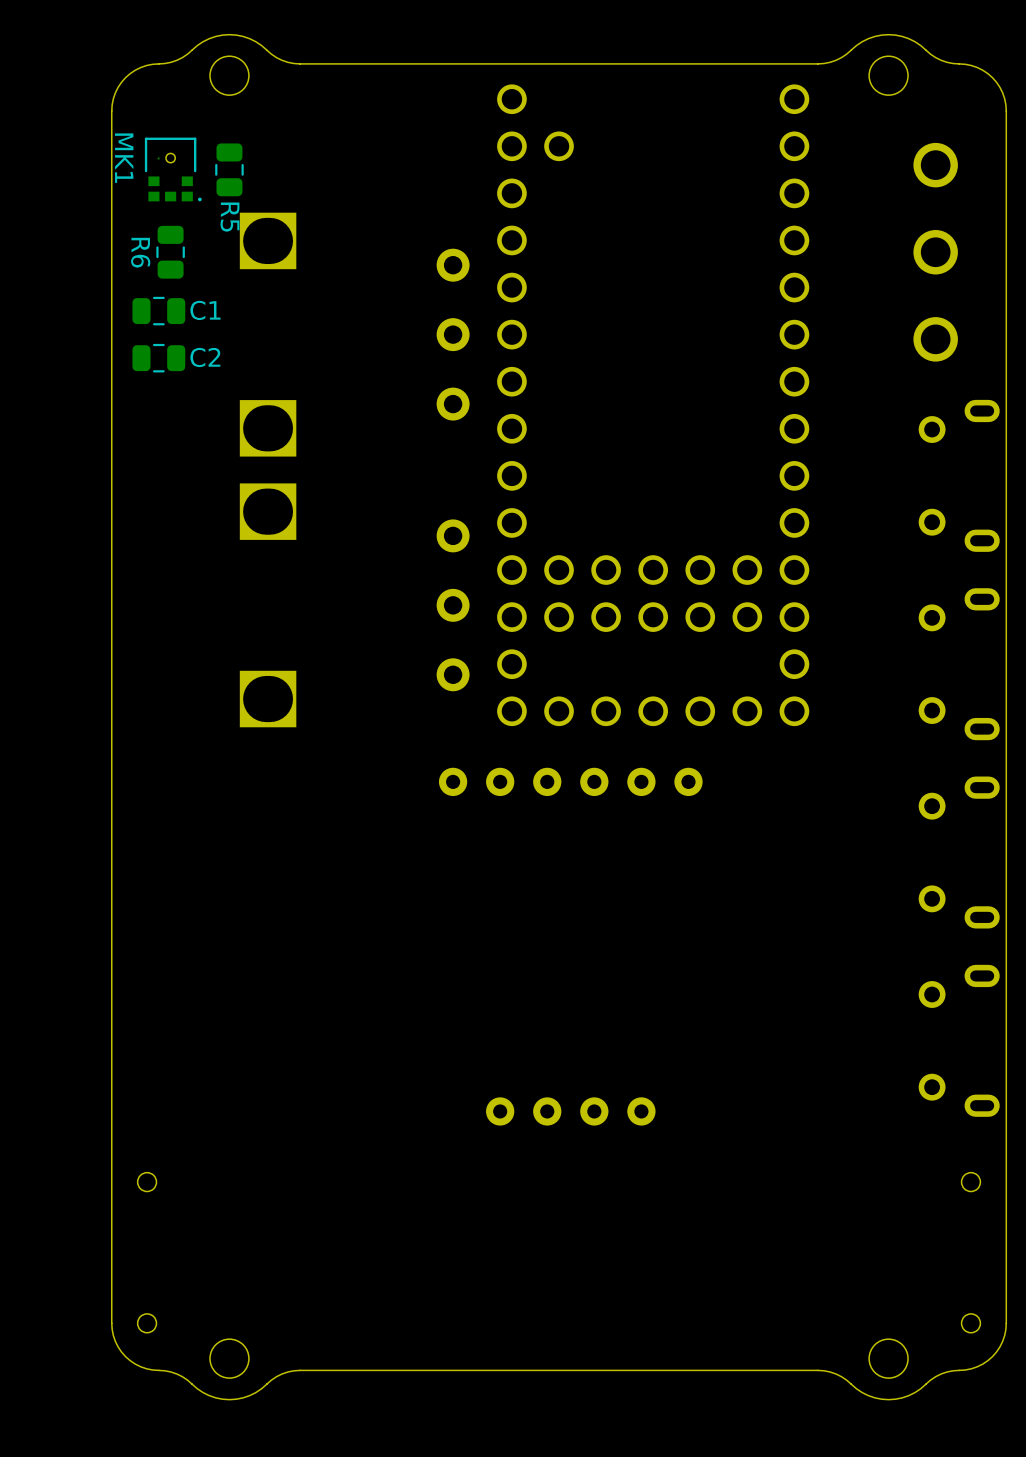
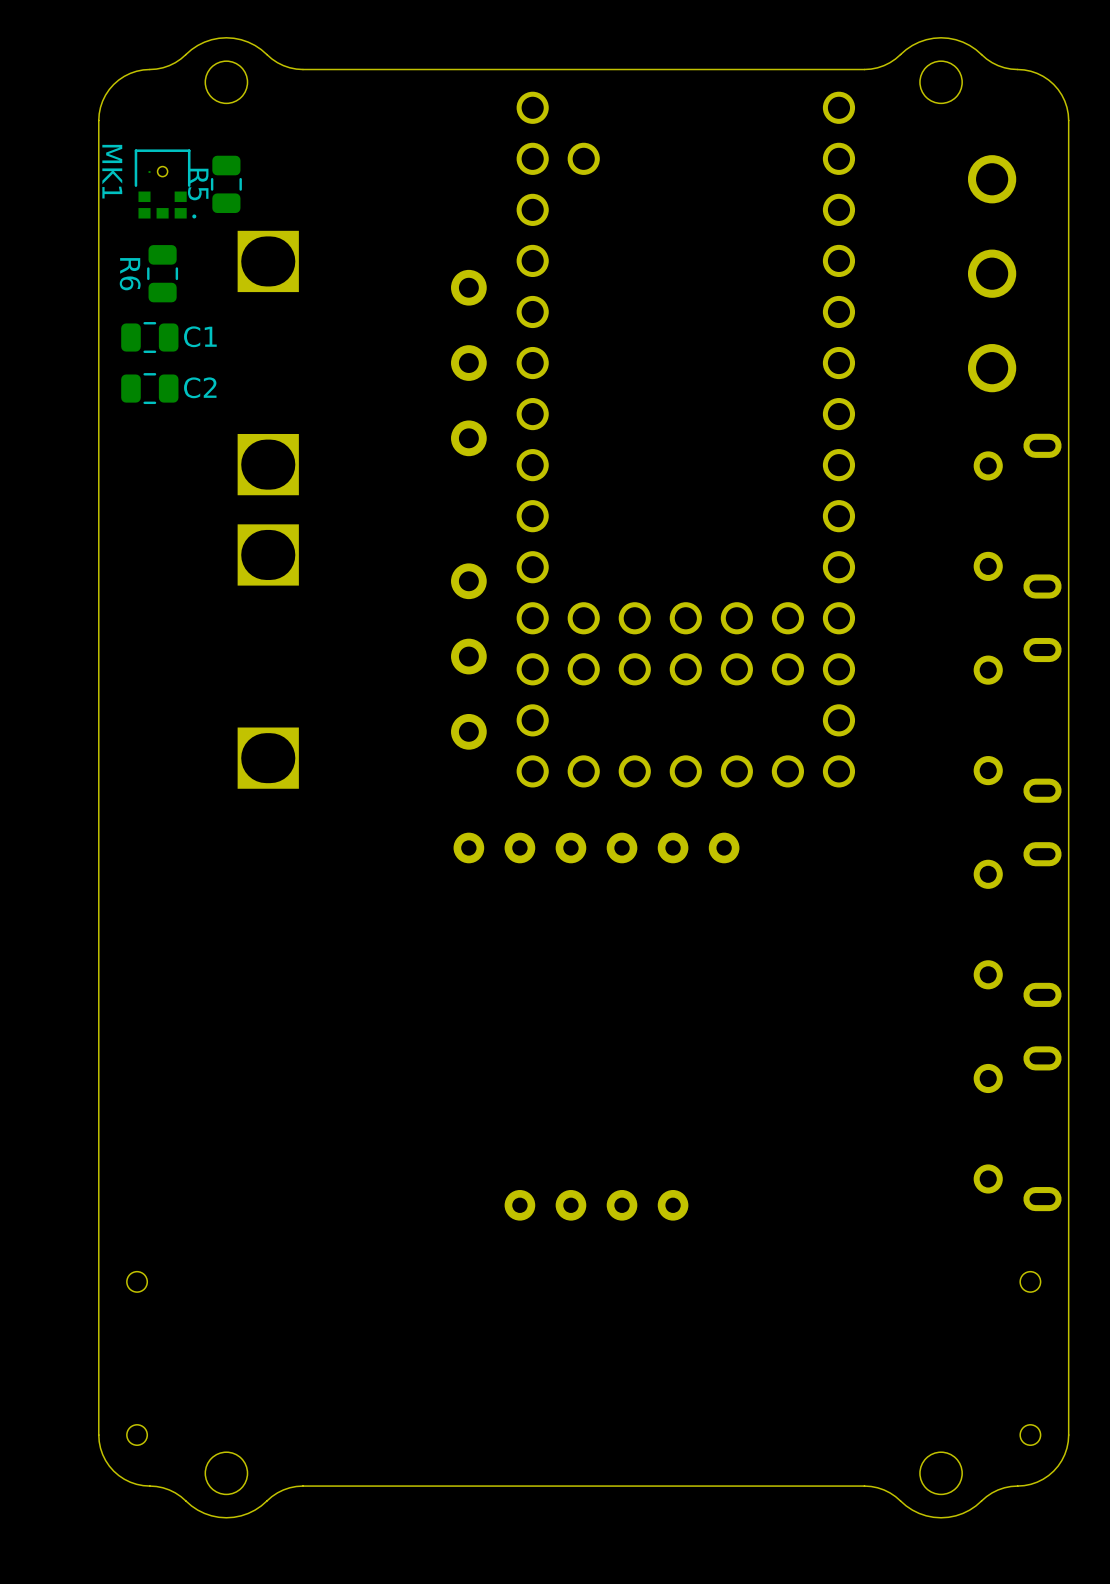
R5 name position: R5 (229, 217) -> R5 (198, 184)

